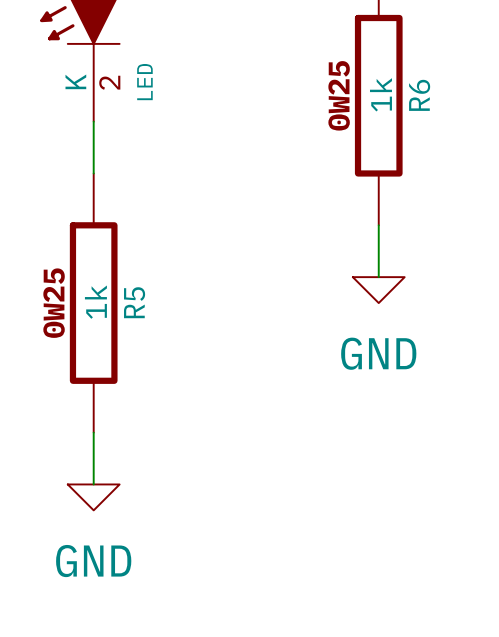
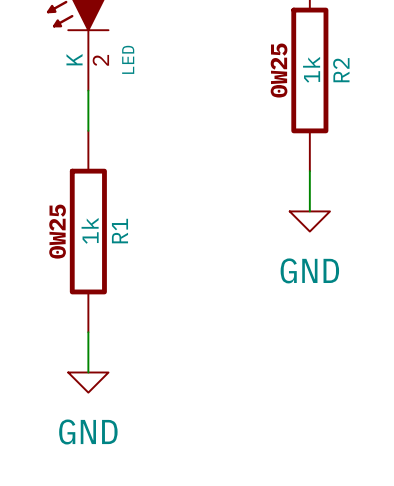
R6 name: R6 (419, 95) -> R2 (341, 70)
R5 name: R5 (134, 302) -> R1 (119, 231)

